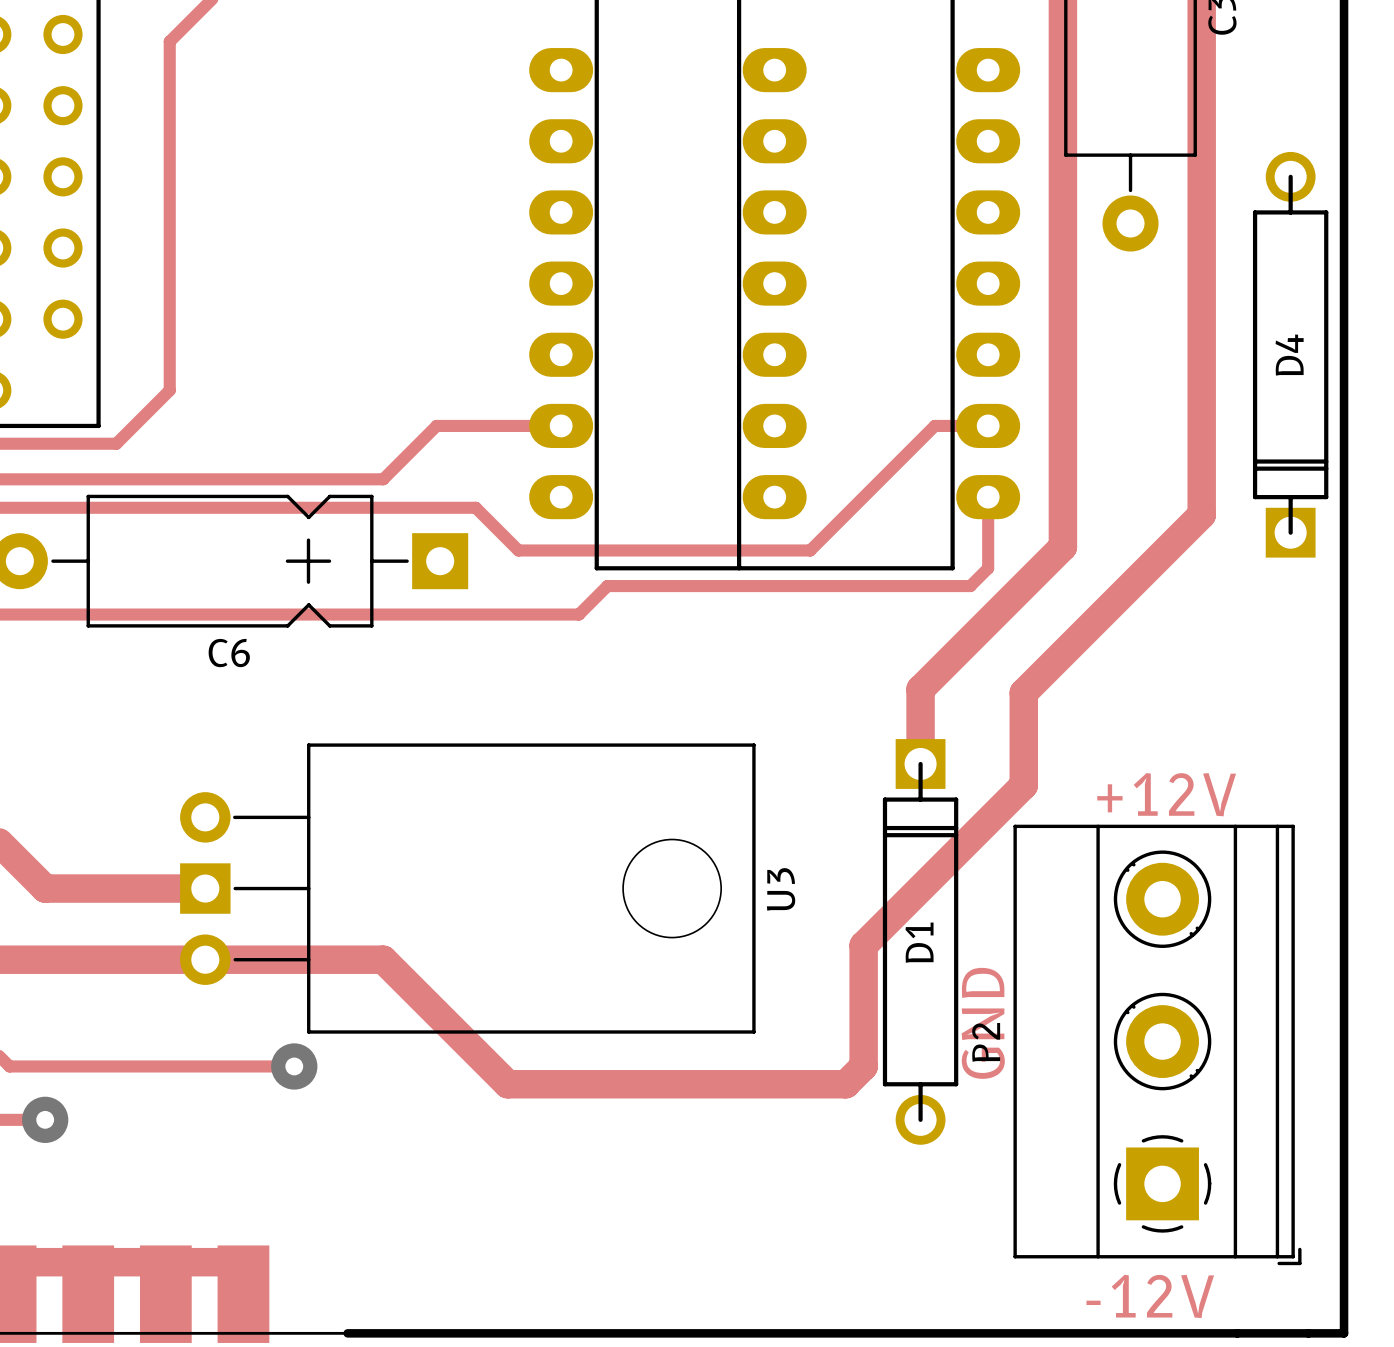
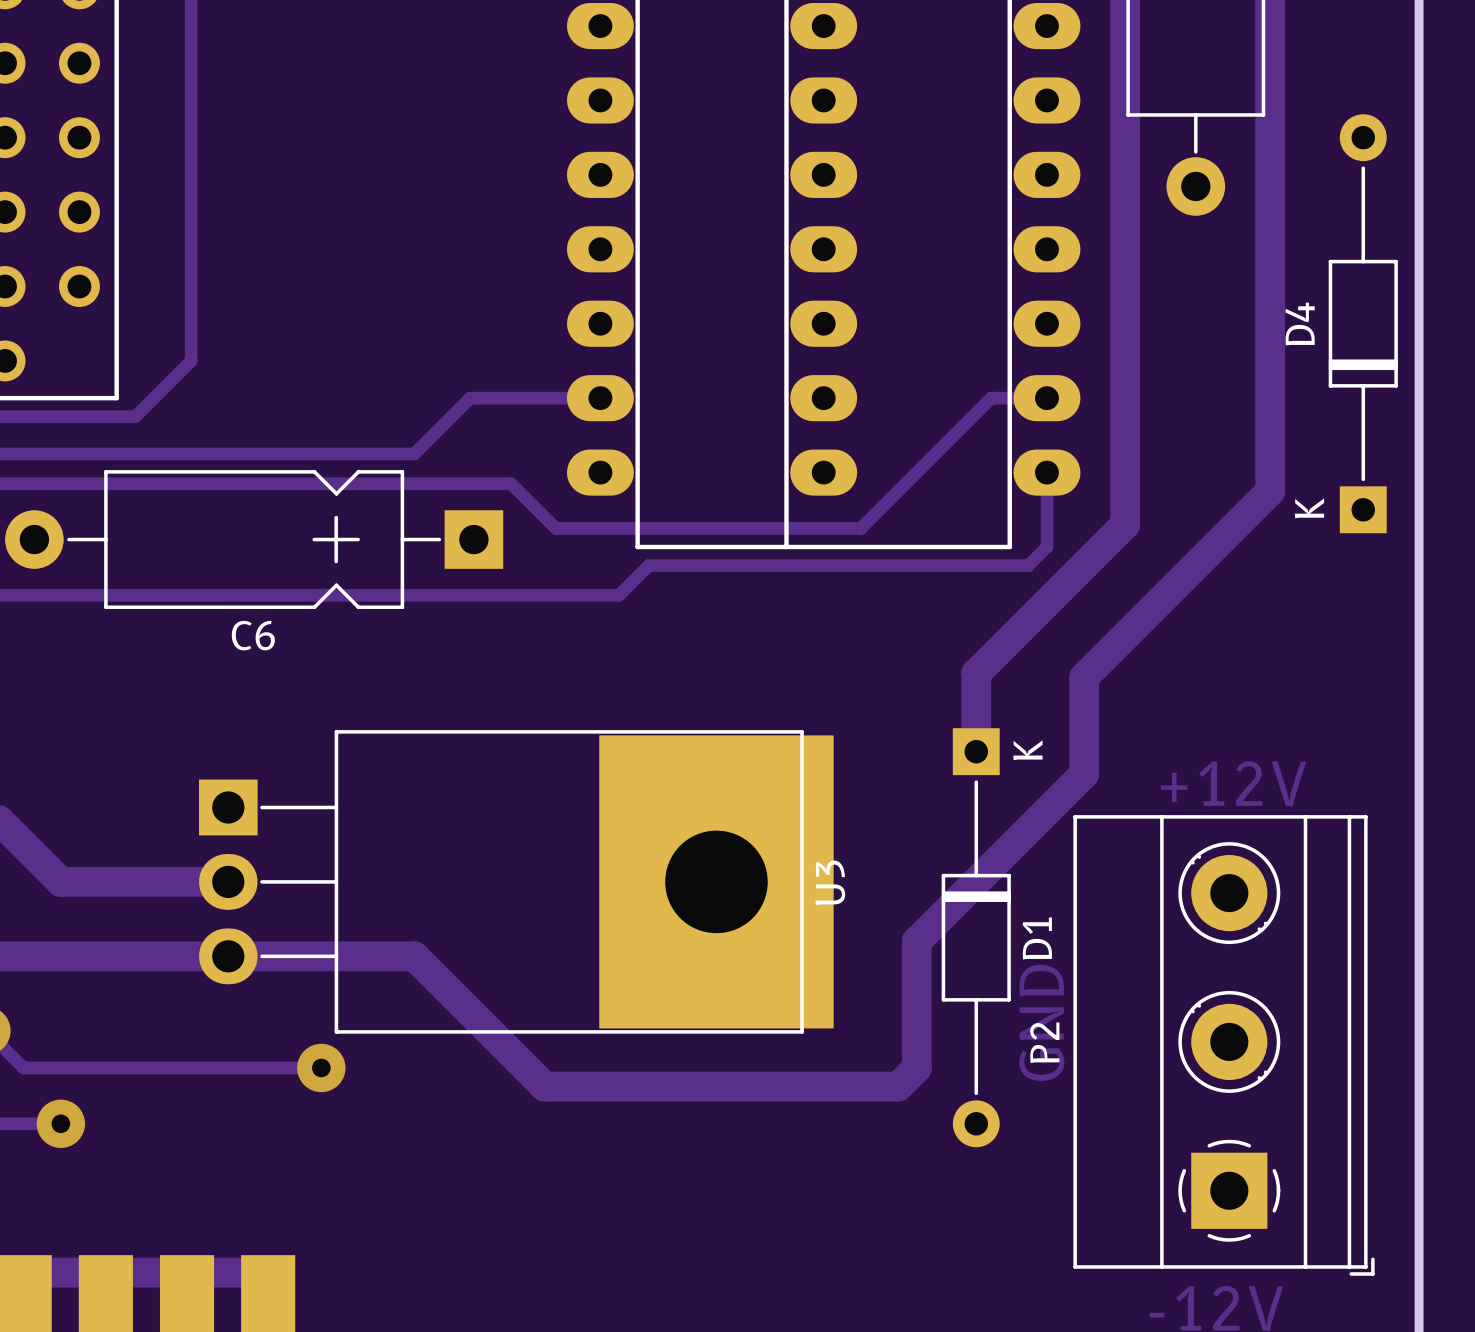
D4 footprint: [1252, 151, 1329, 558] -> [1328, 114, 1398, 534]
D4 name position: D4 (1289, 355) -> D4 (1300, 324)
D1 footprint: [882, 739, 959, 1145] -> [941, 728, 1011, 1148]
U3 footprint: [180, 743, 756, 1034] -> [199, 730, 834, 1034]
D1 name position: D1 (919, 942) -> D1 (1037, 938)

